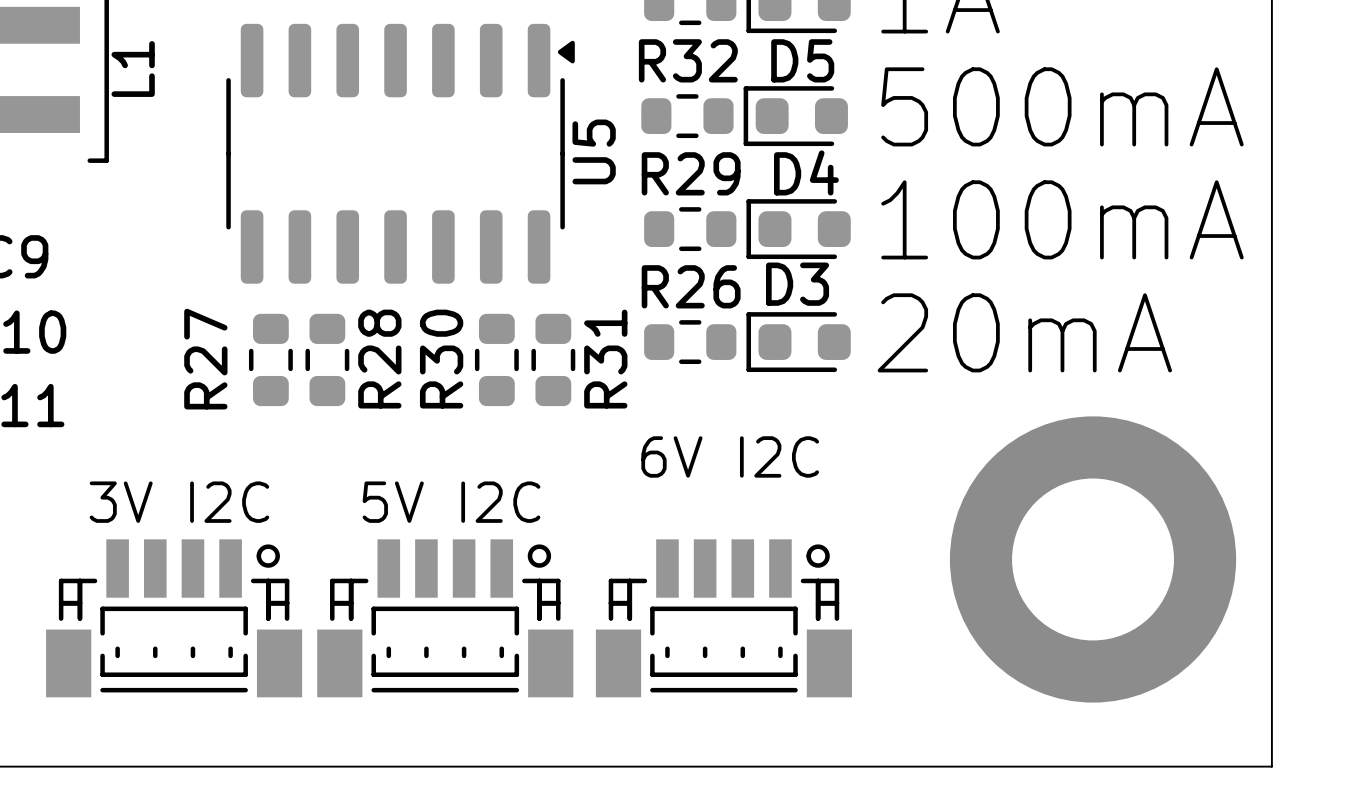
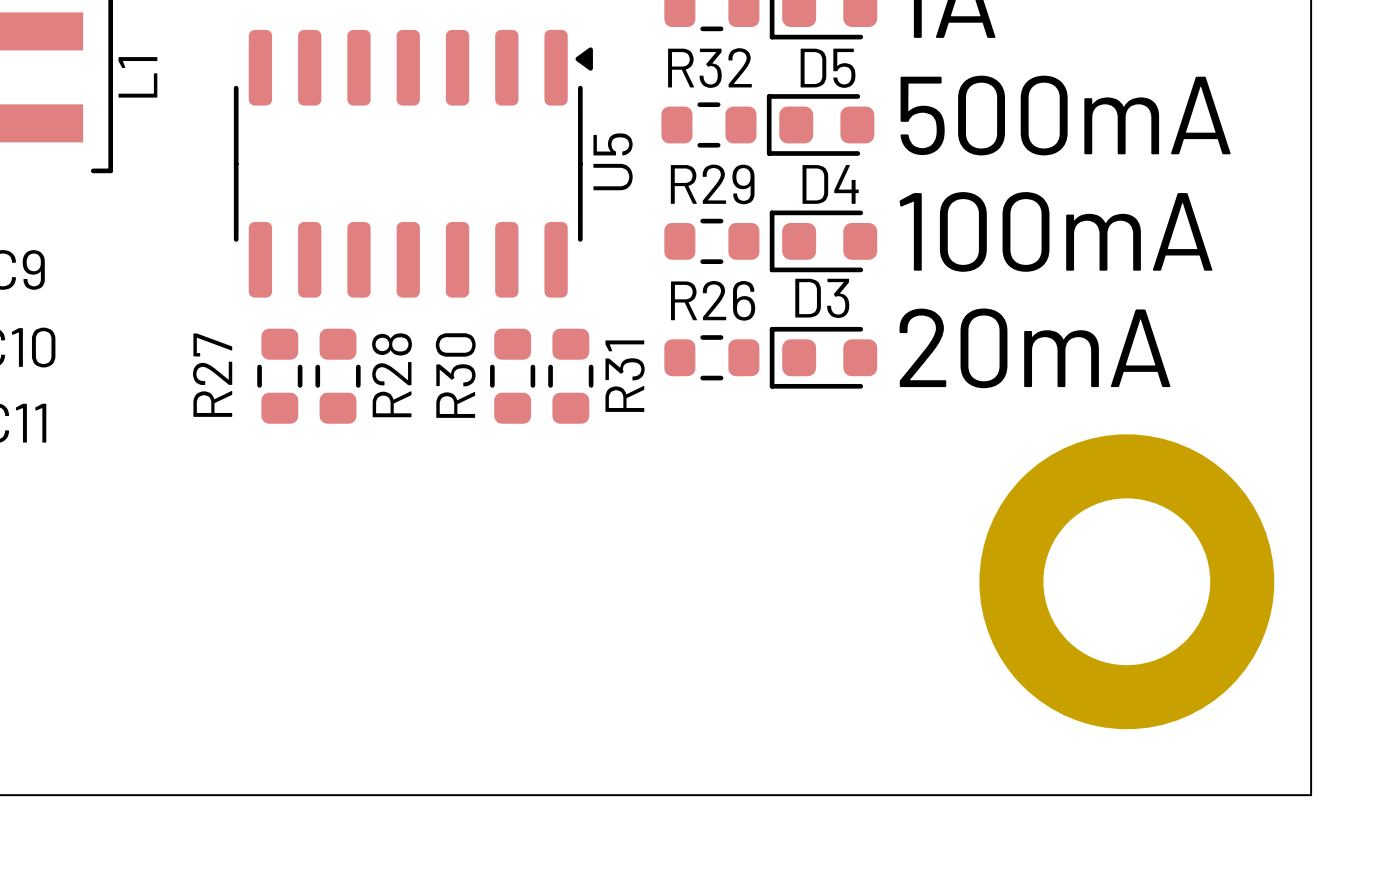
text: 6V I2C (730, 456) -> none
text: 3V I2C (179, 502) -> none
text: 5V I2C (451, 502) -> none
part: (174, 618) -> none
part: (445, 618) -> none
part: (723, 618) -> none

